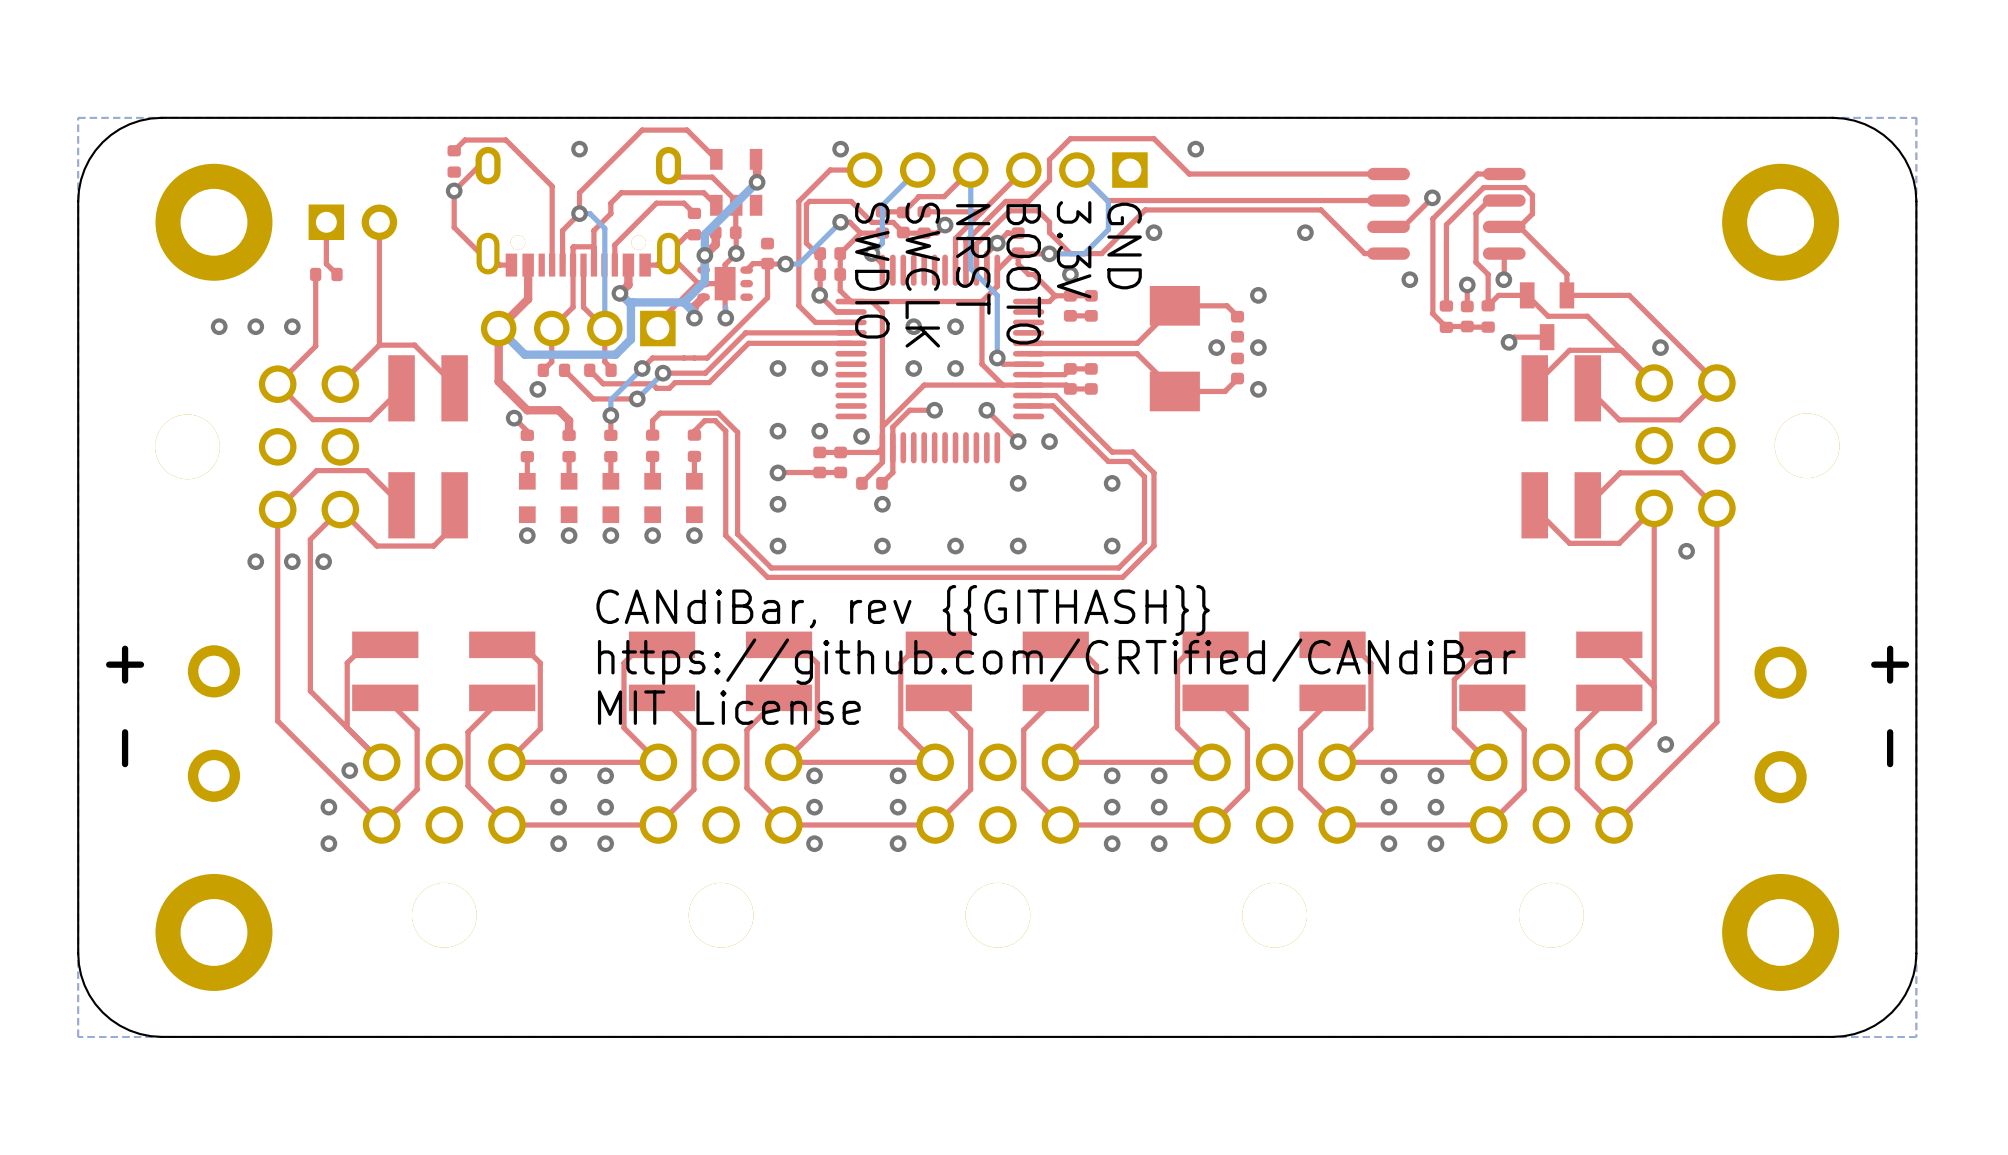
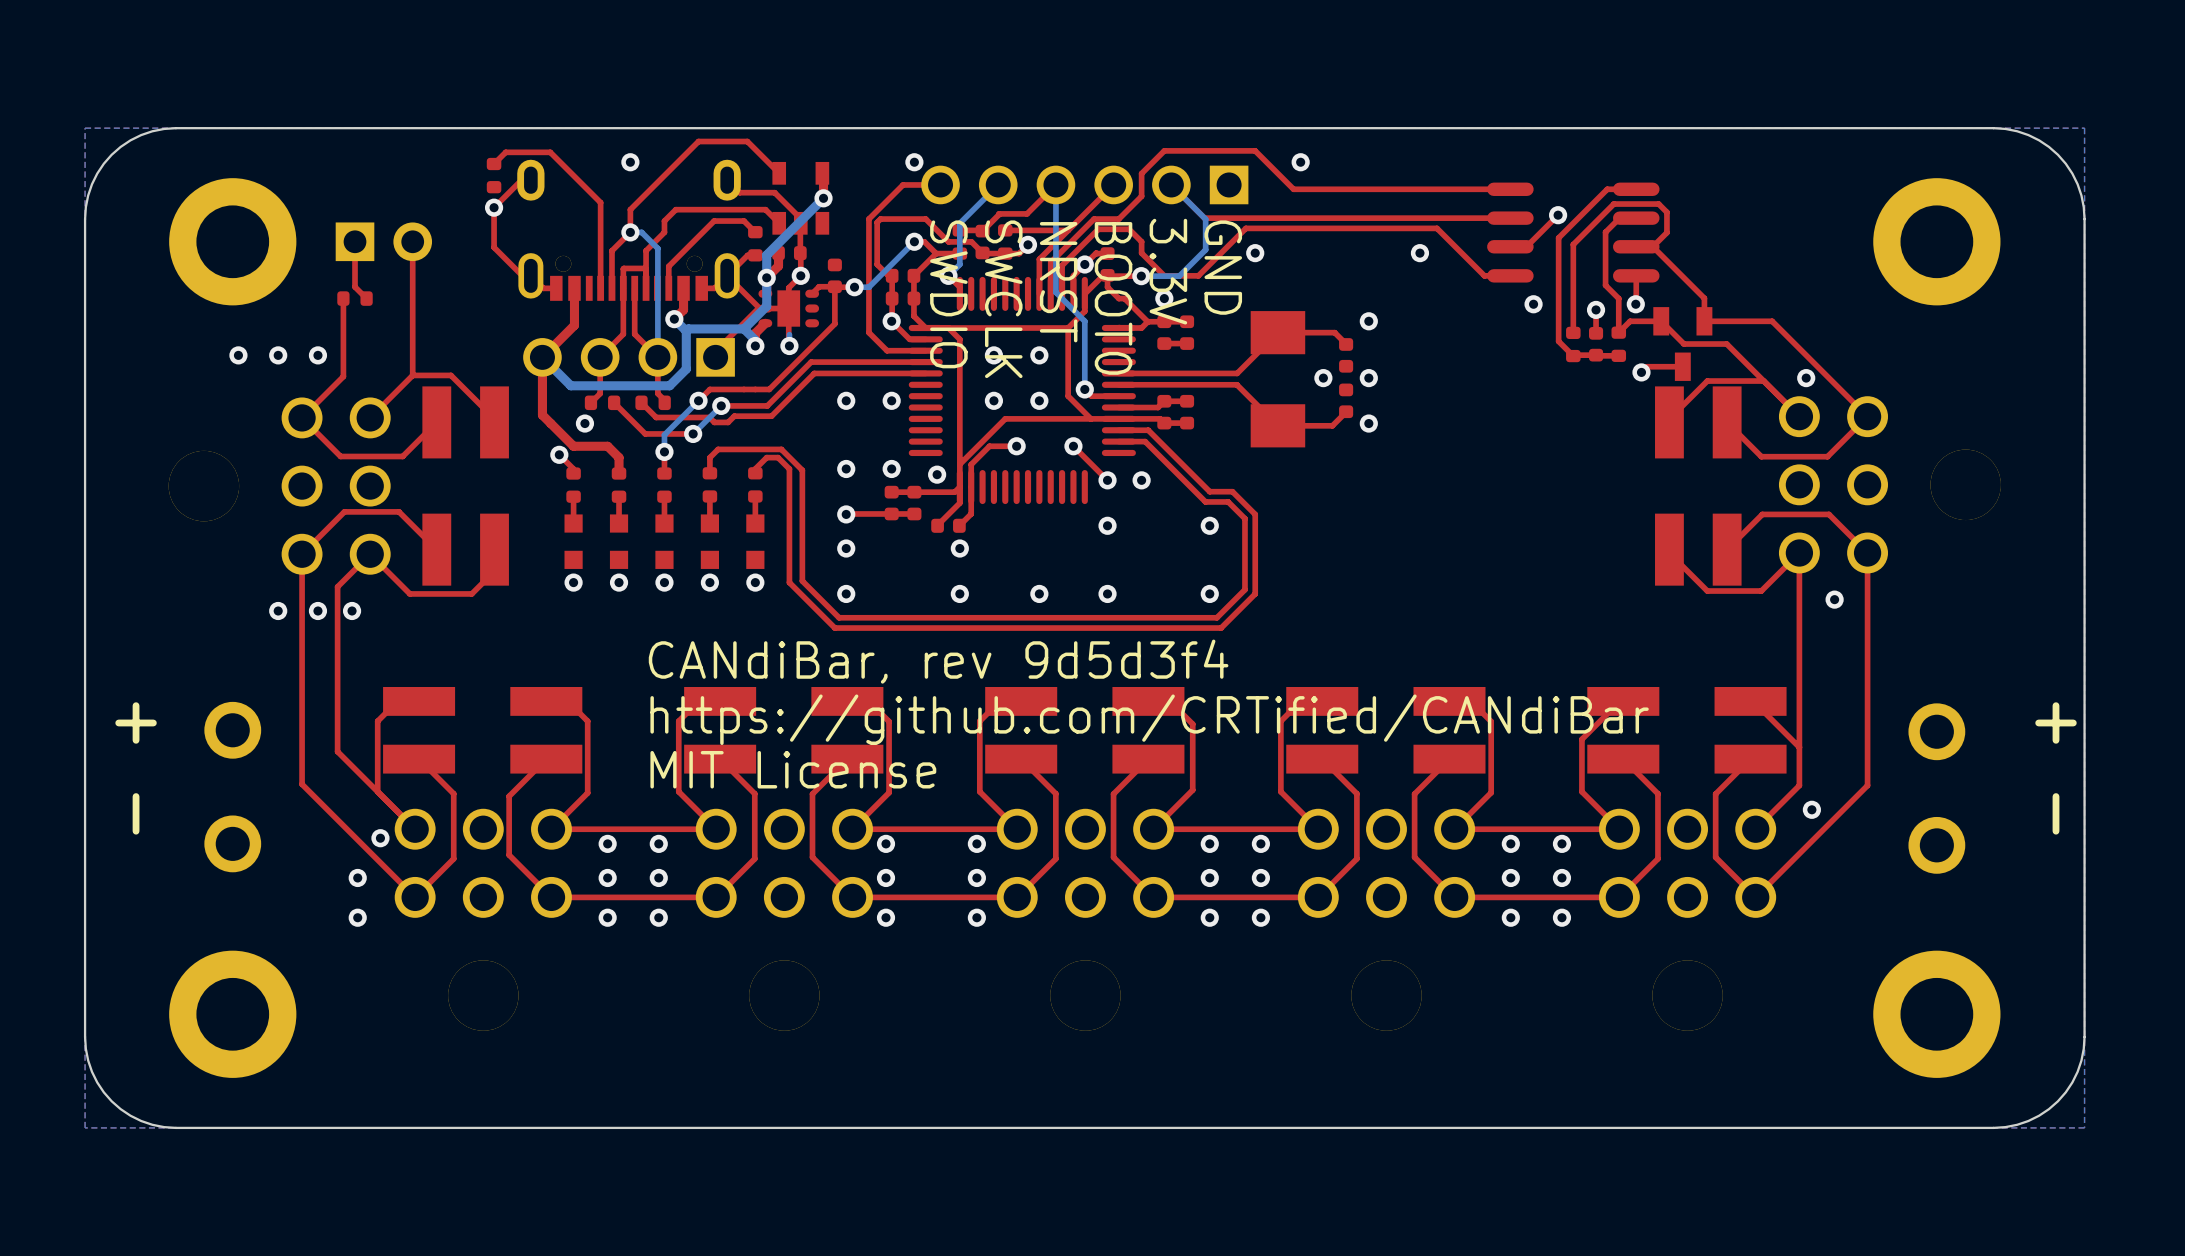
text: CANdiBar, rev {{GITHASH}} (903, 610) -> CANdiBar, rev 9d5d3f4 (938, 661)

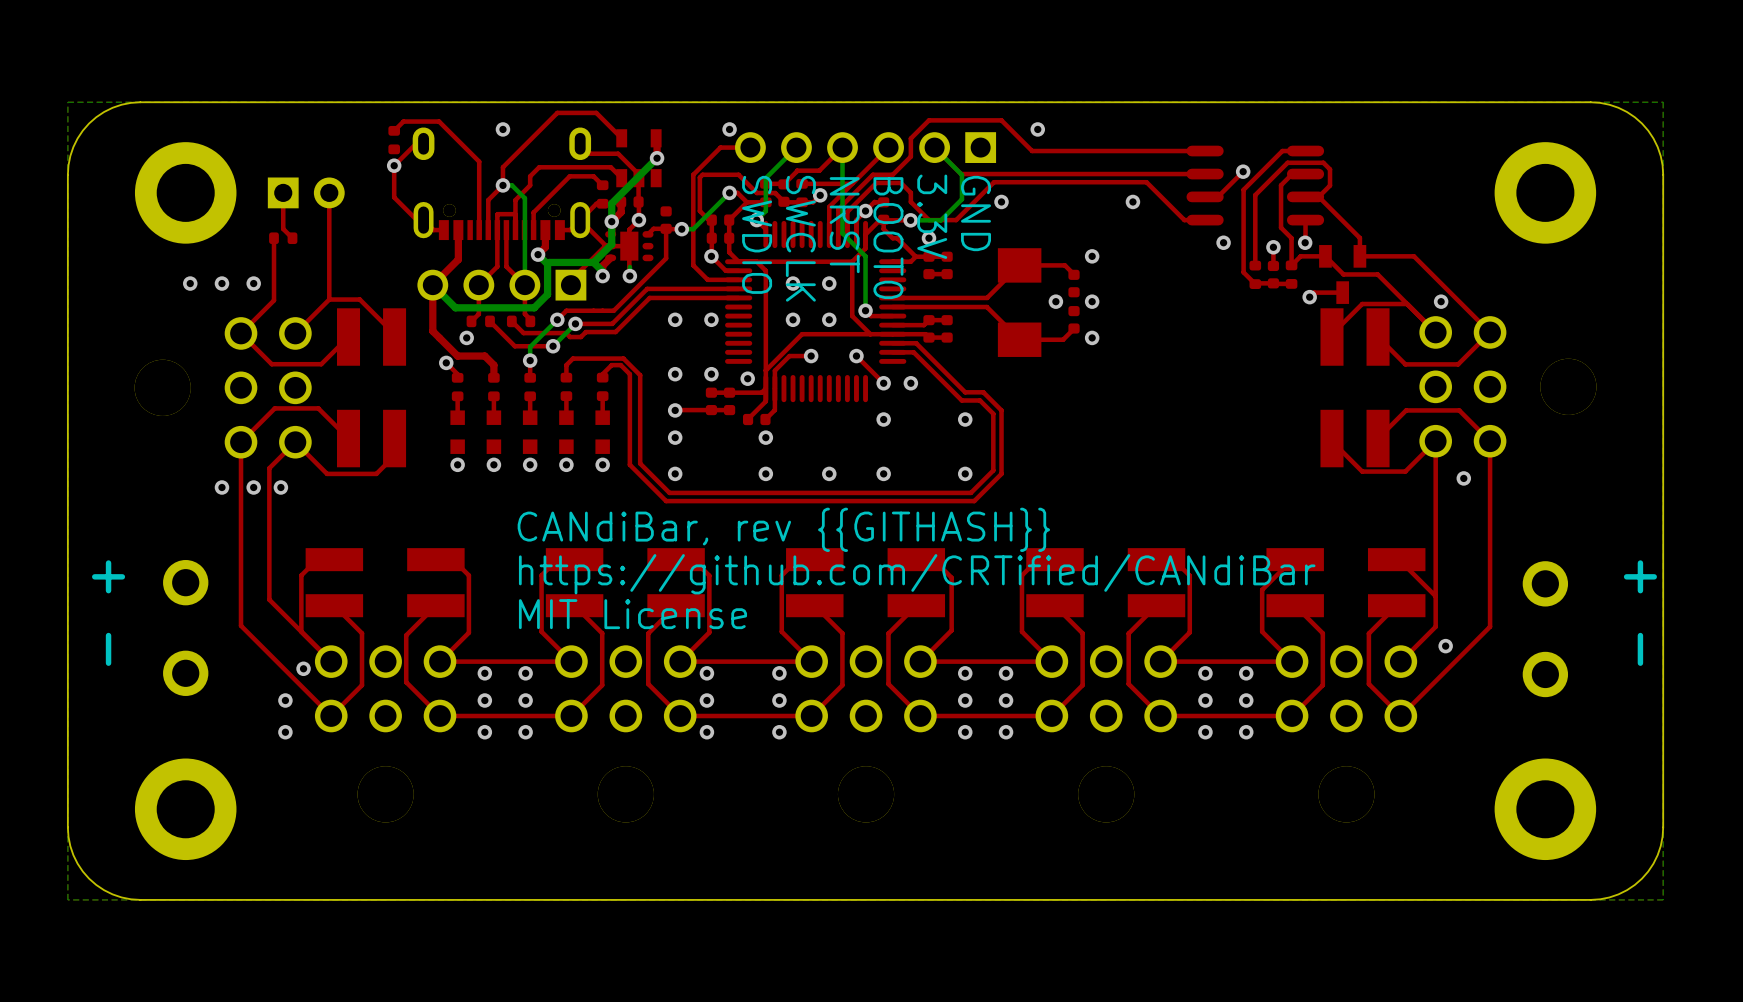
text: CANdiBar, rev 9d5d3f4 (938, 661) -> CANdiBar, rev {{GITHASH}} (783, 529)

